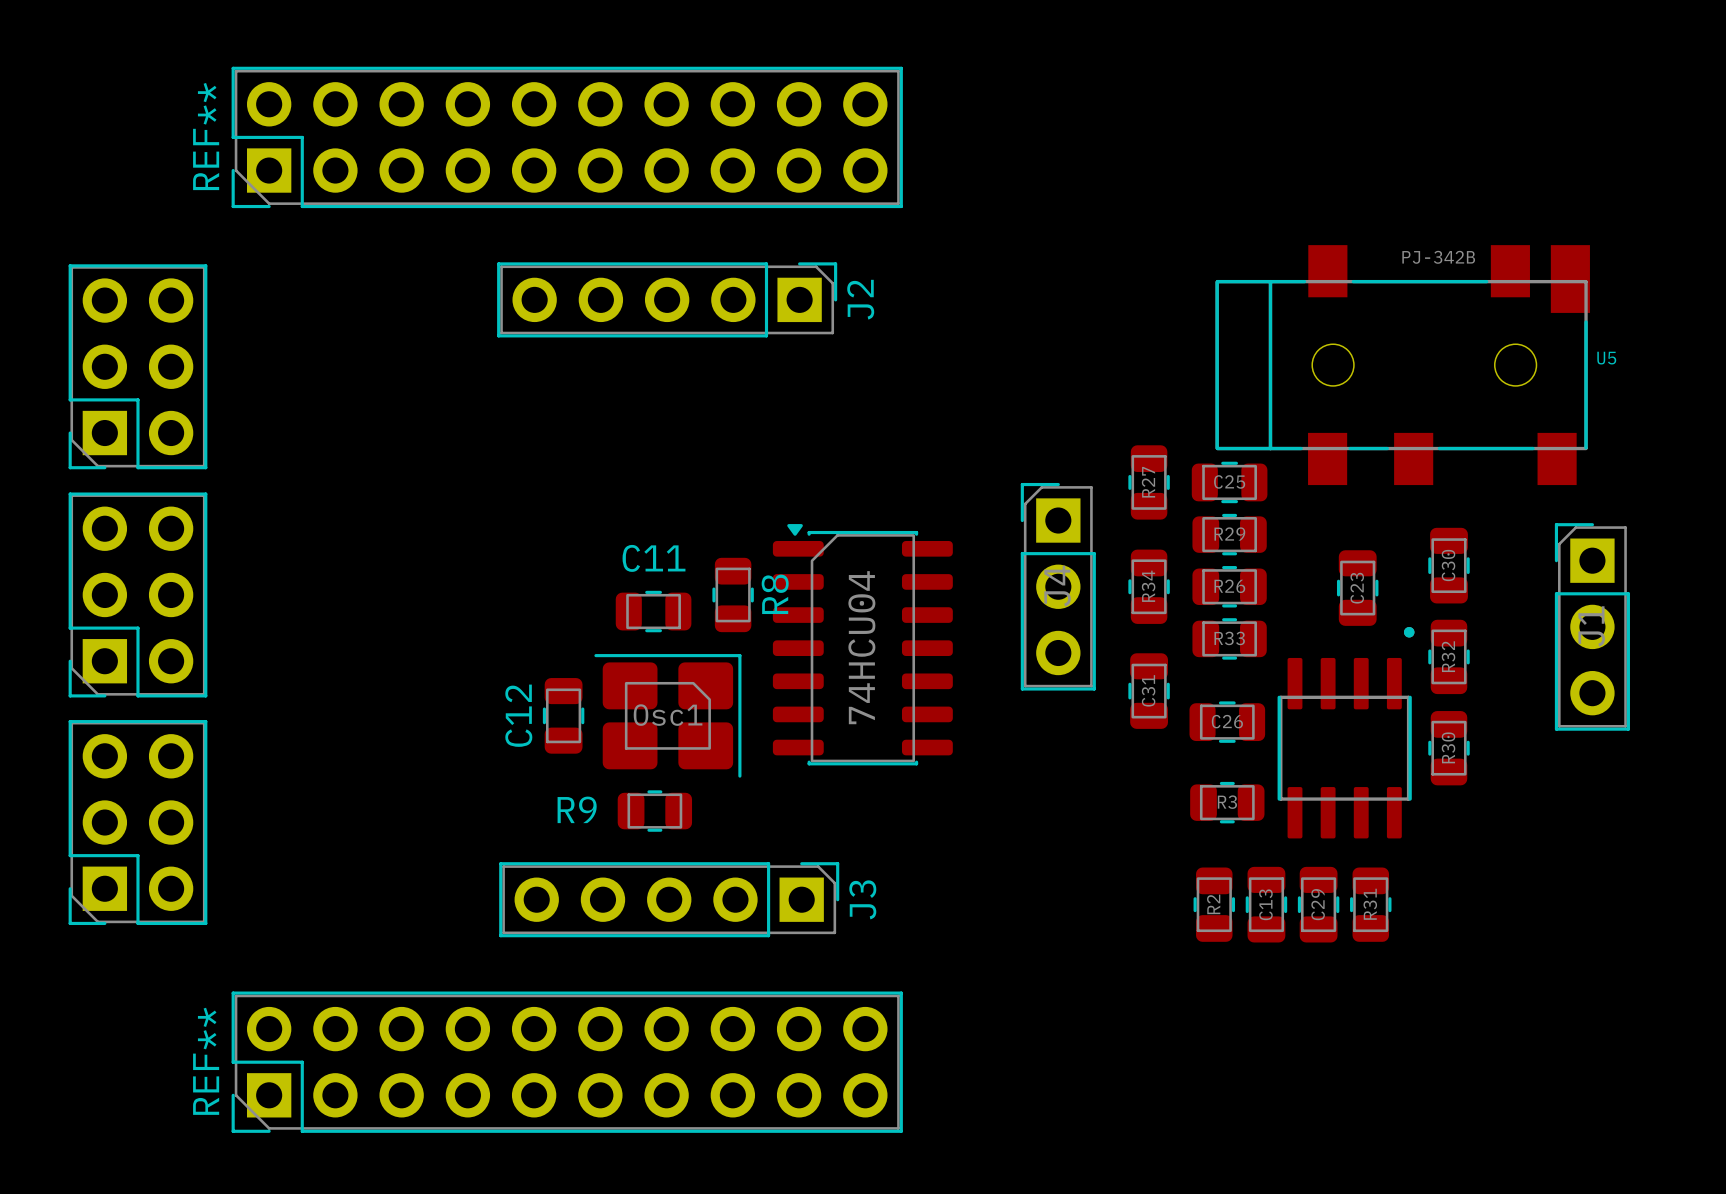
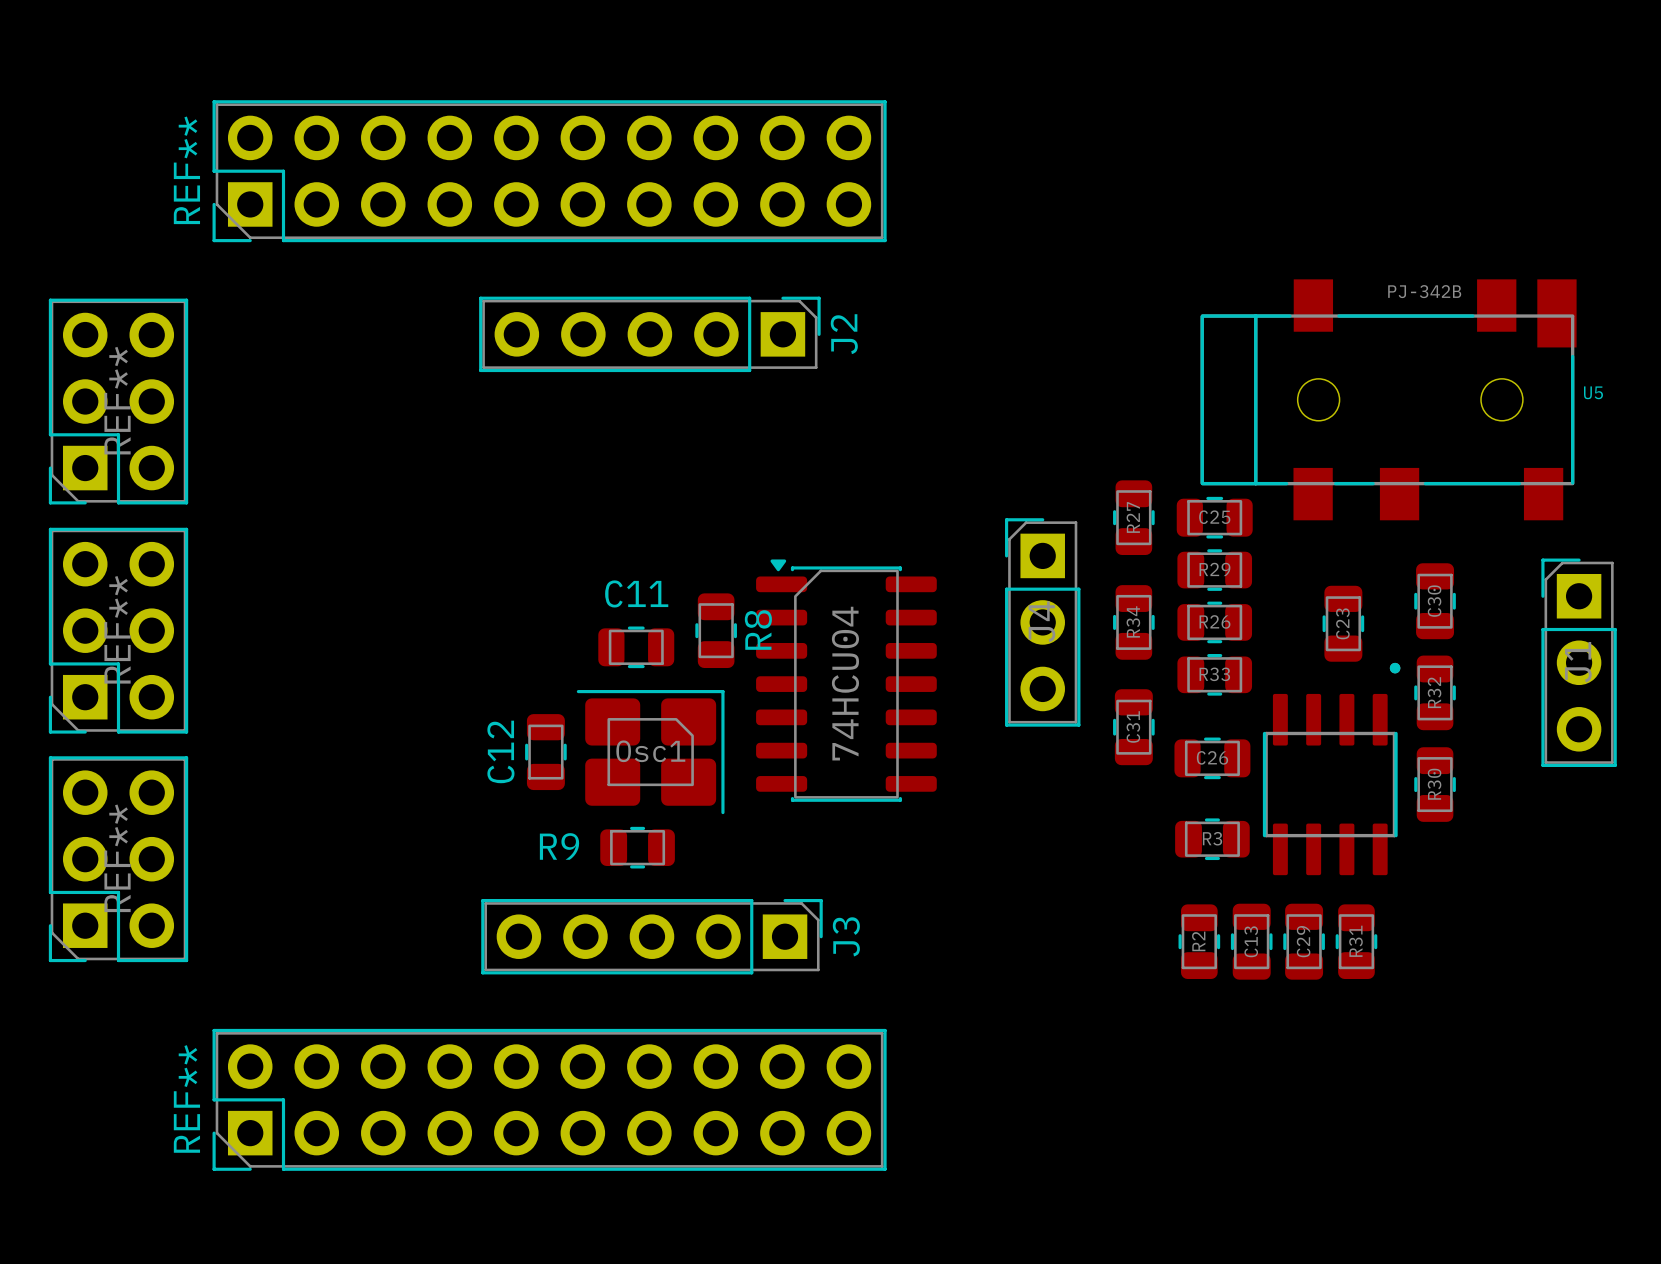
REF** name: none -> REF** (117, 400)
REF** name: none -> REF** (117, 629)
REF** name: none -> REF** (117, 858)

